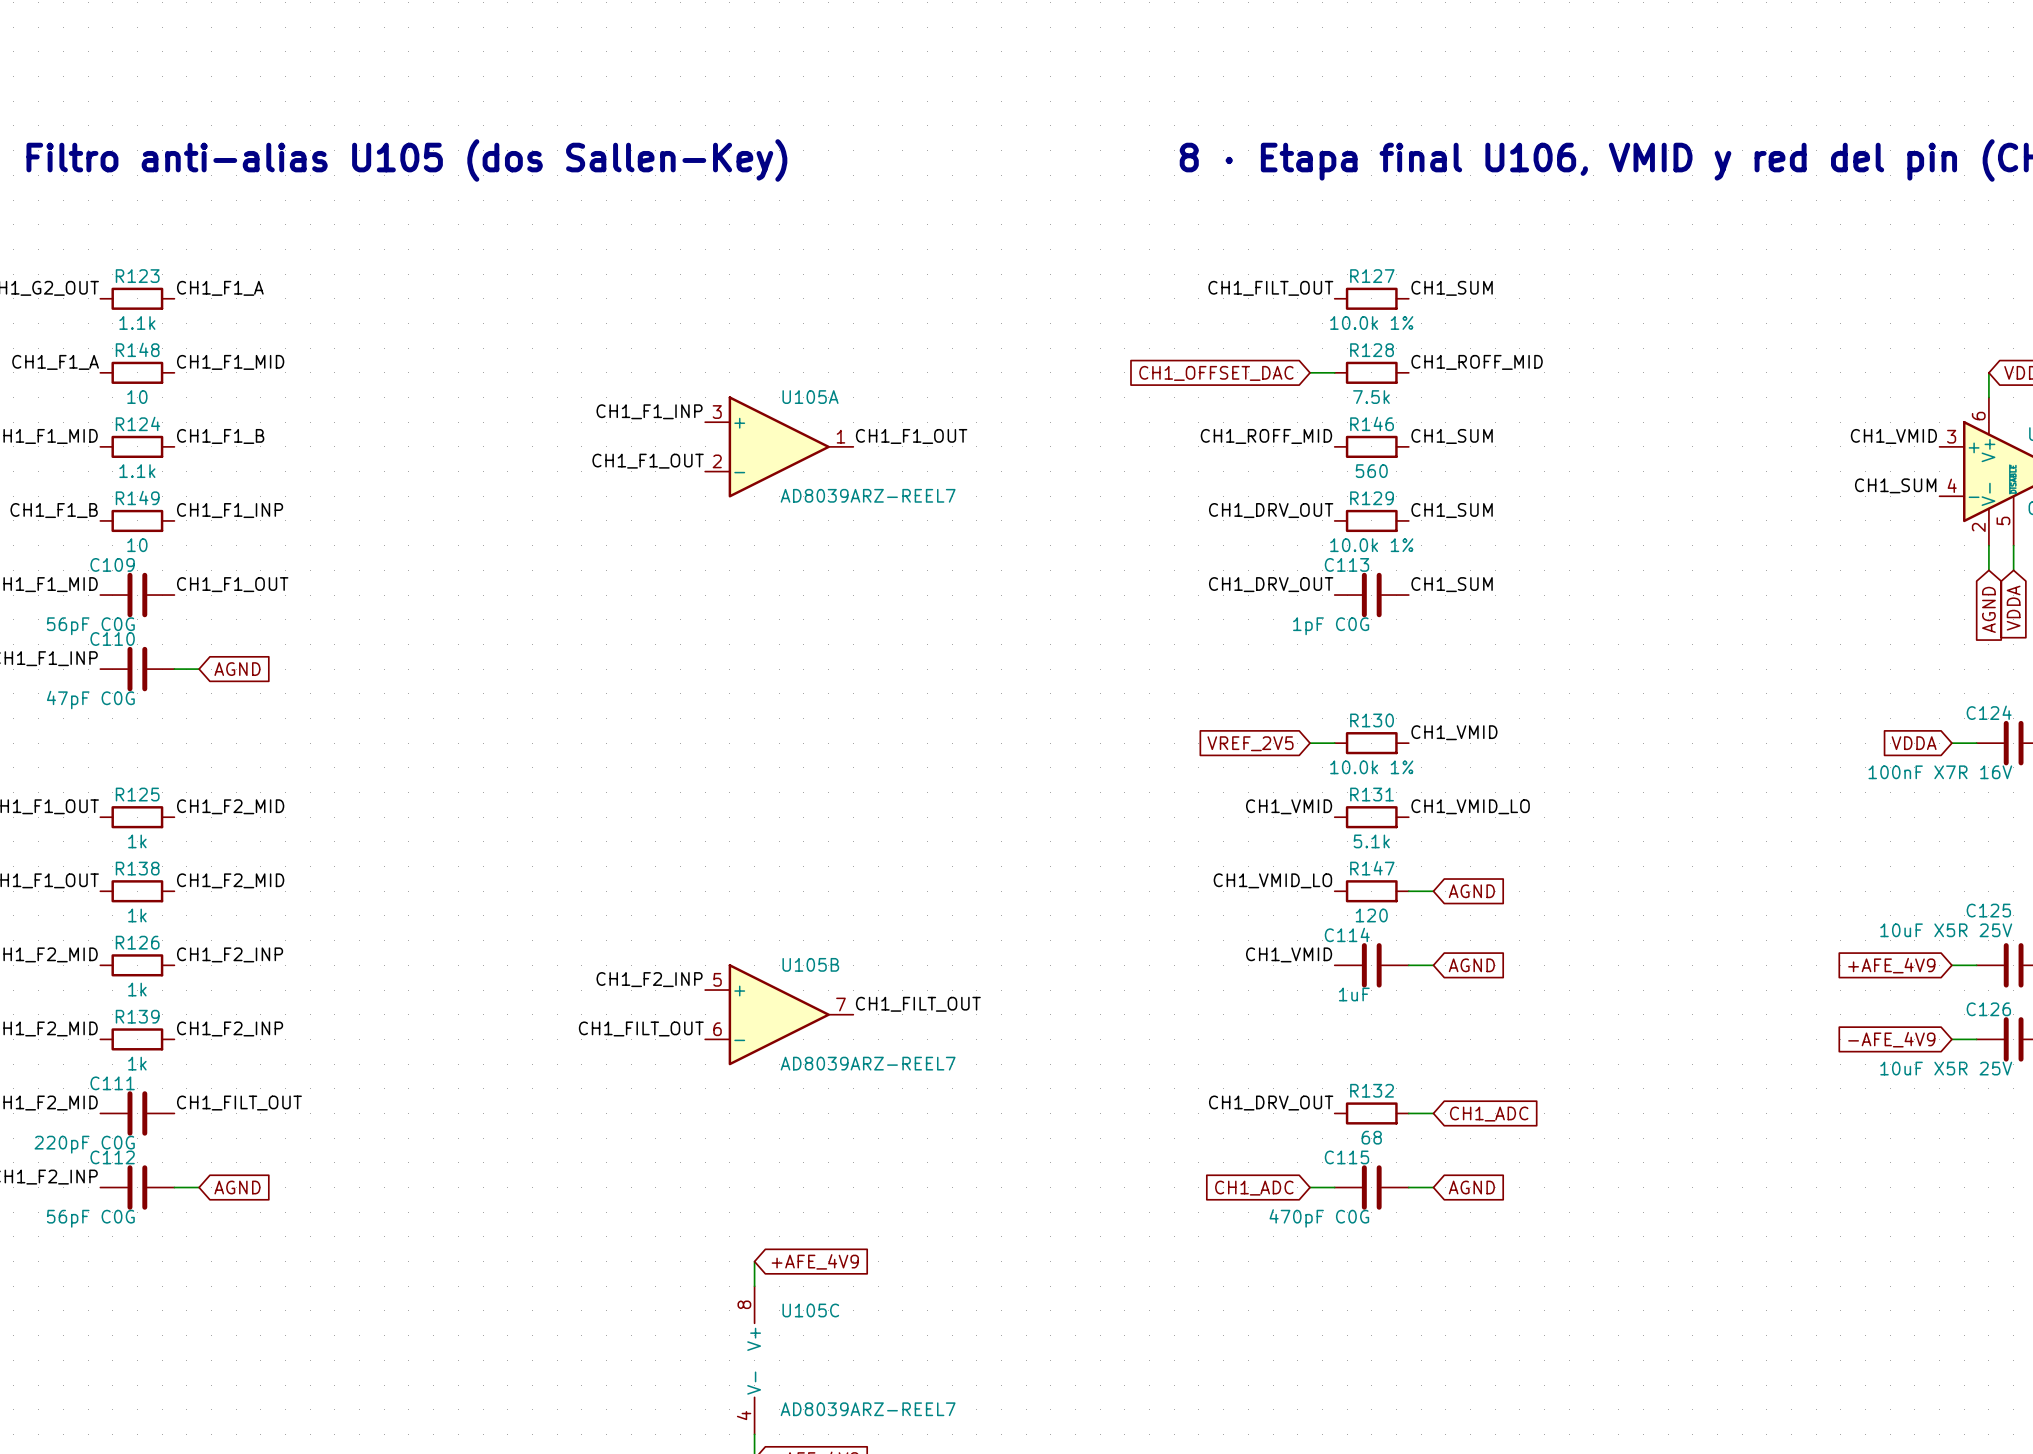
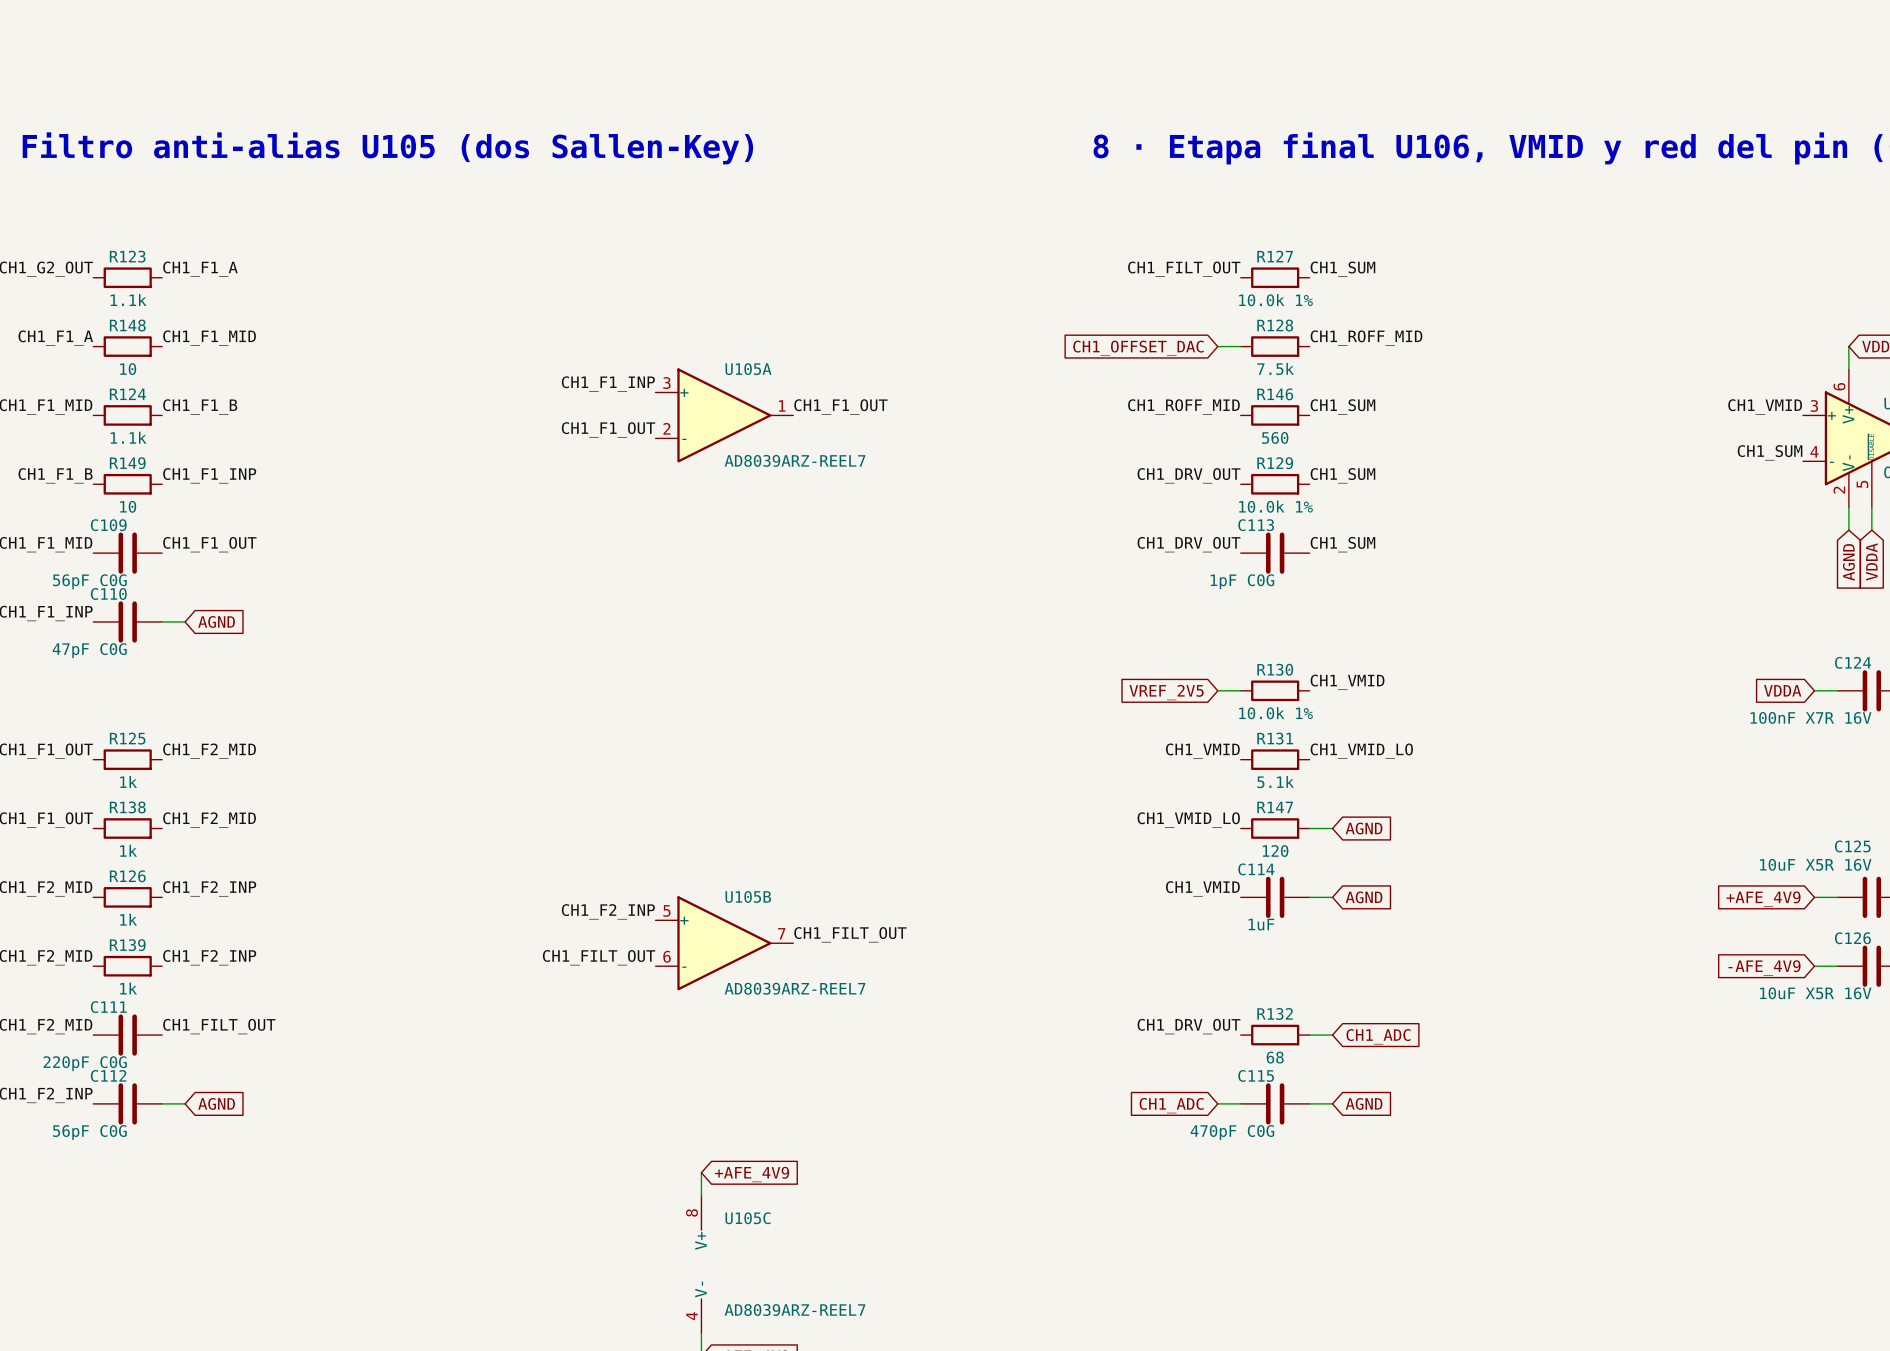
C125 value: 10uF X5R 25V (1946, 930) -> 10uF X5R 16V (1815, 864)
C126 value: 10uF X5R 25V (1946, 1068) -> 10uF X5R 16V (1815, 993)

